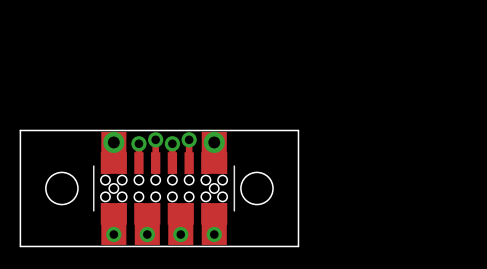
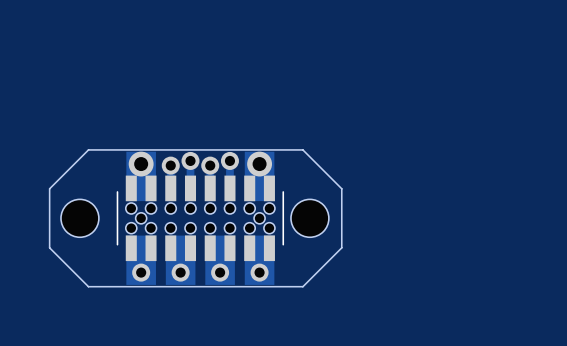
board edge: (69, 130) (20, 130) (20, 246) (69, 246) -> (88, 149) (49, 188) (49, 247) (88, 286)
board edge: (251, 130) (298, 130) (298, 246) (251, 246) -> (302, 149) (341, 188) (341, 247) (302, 286)

